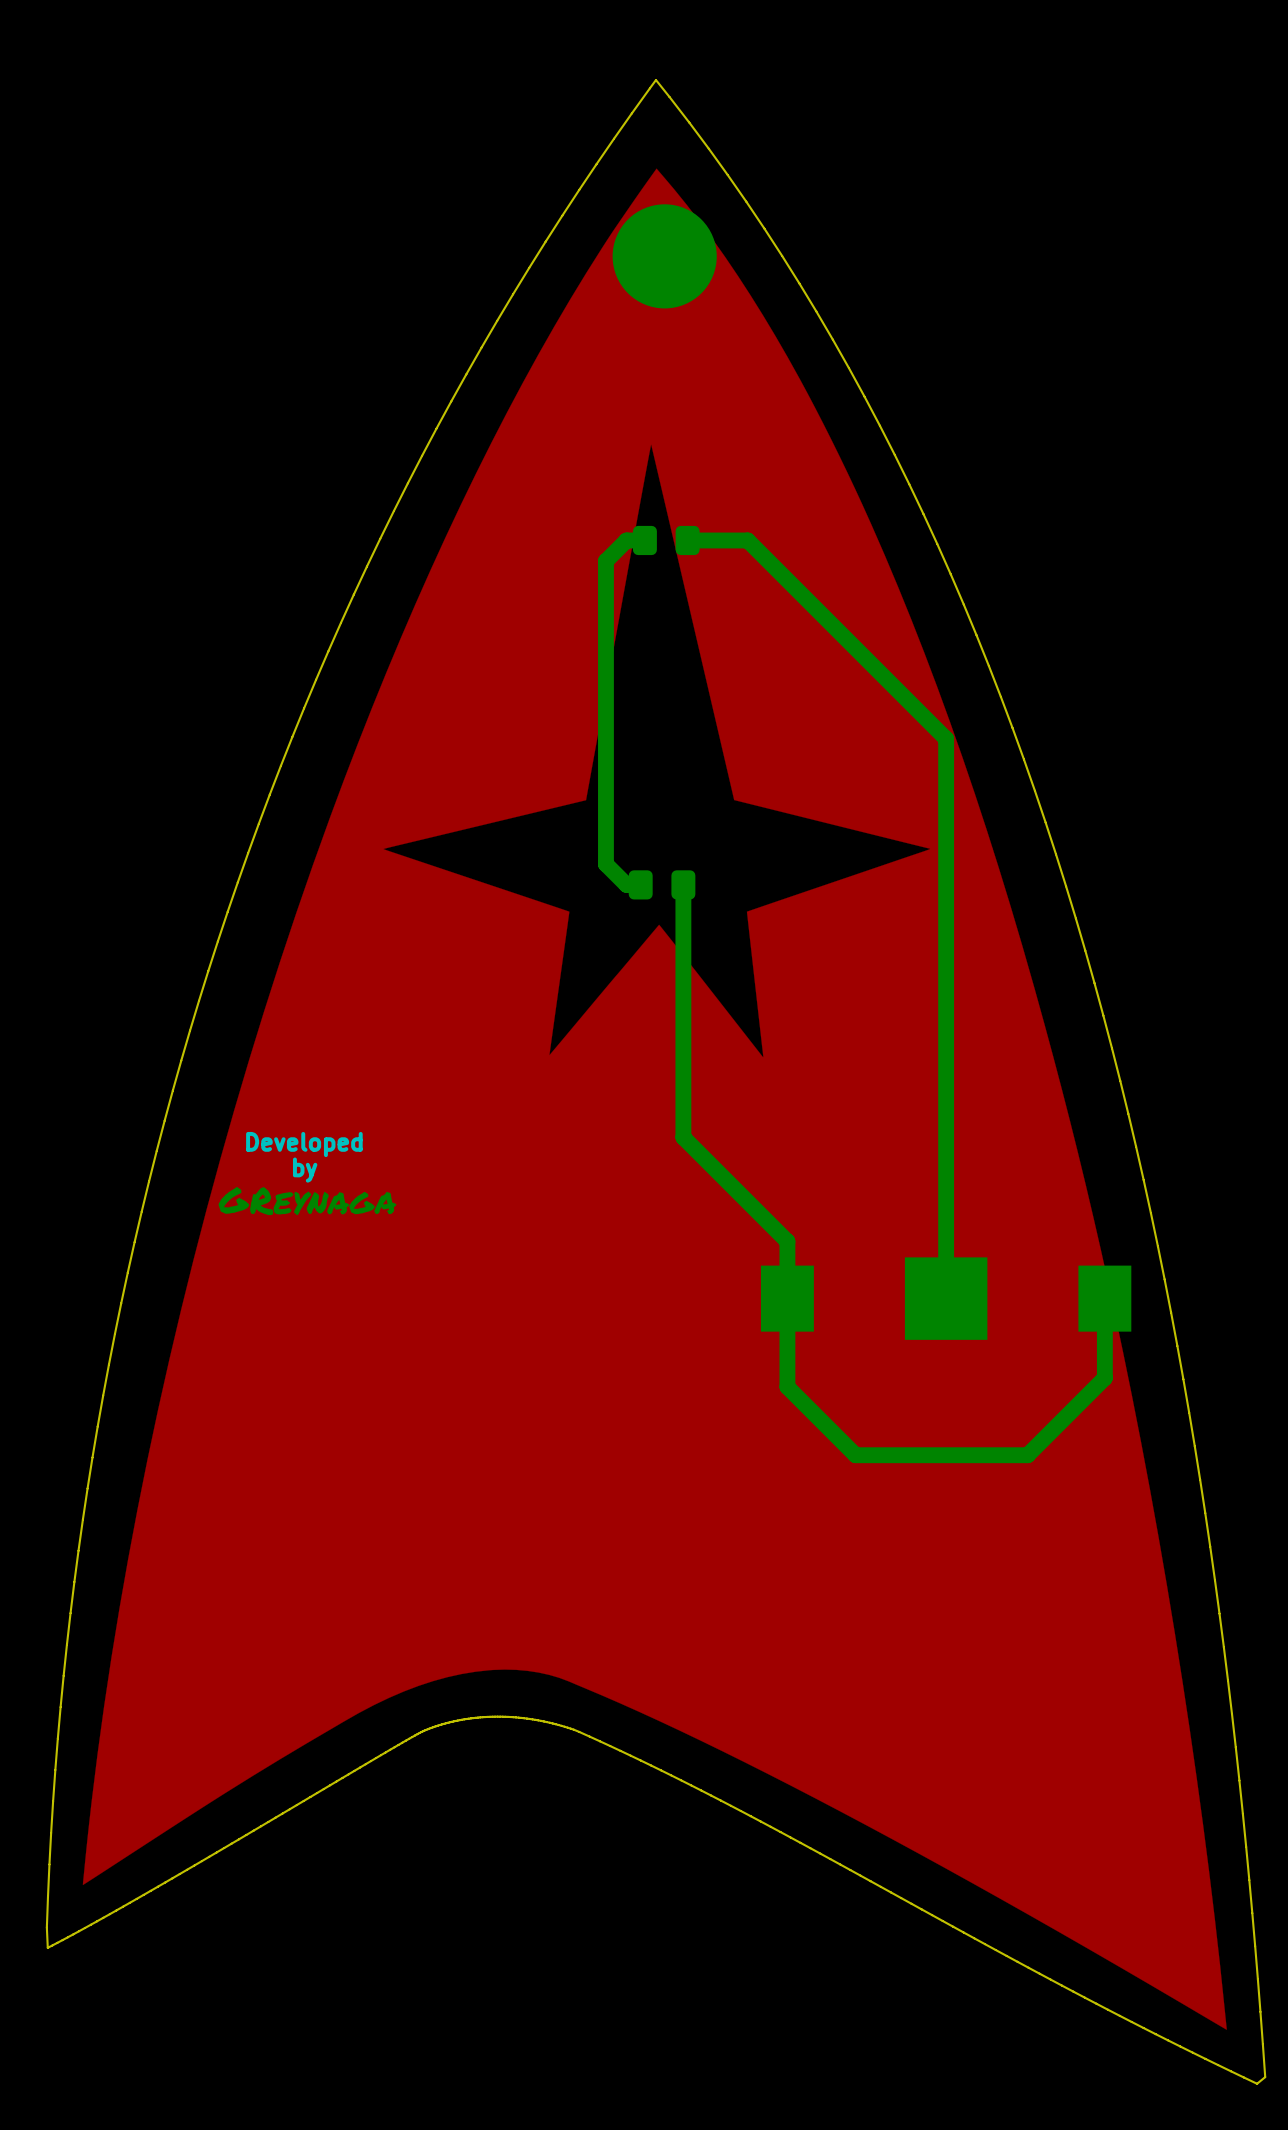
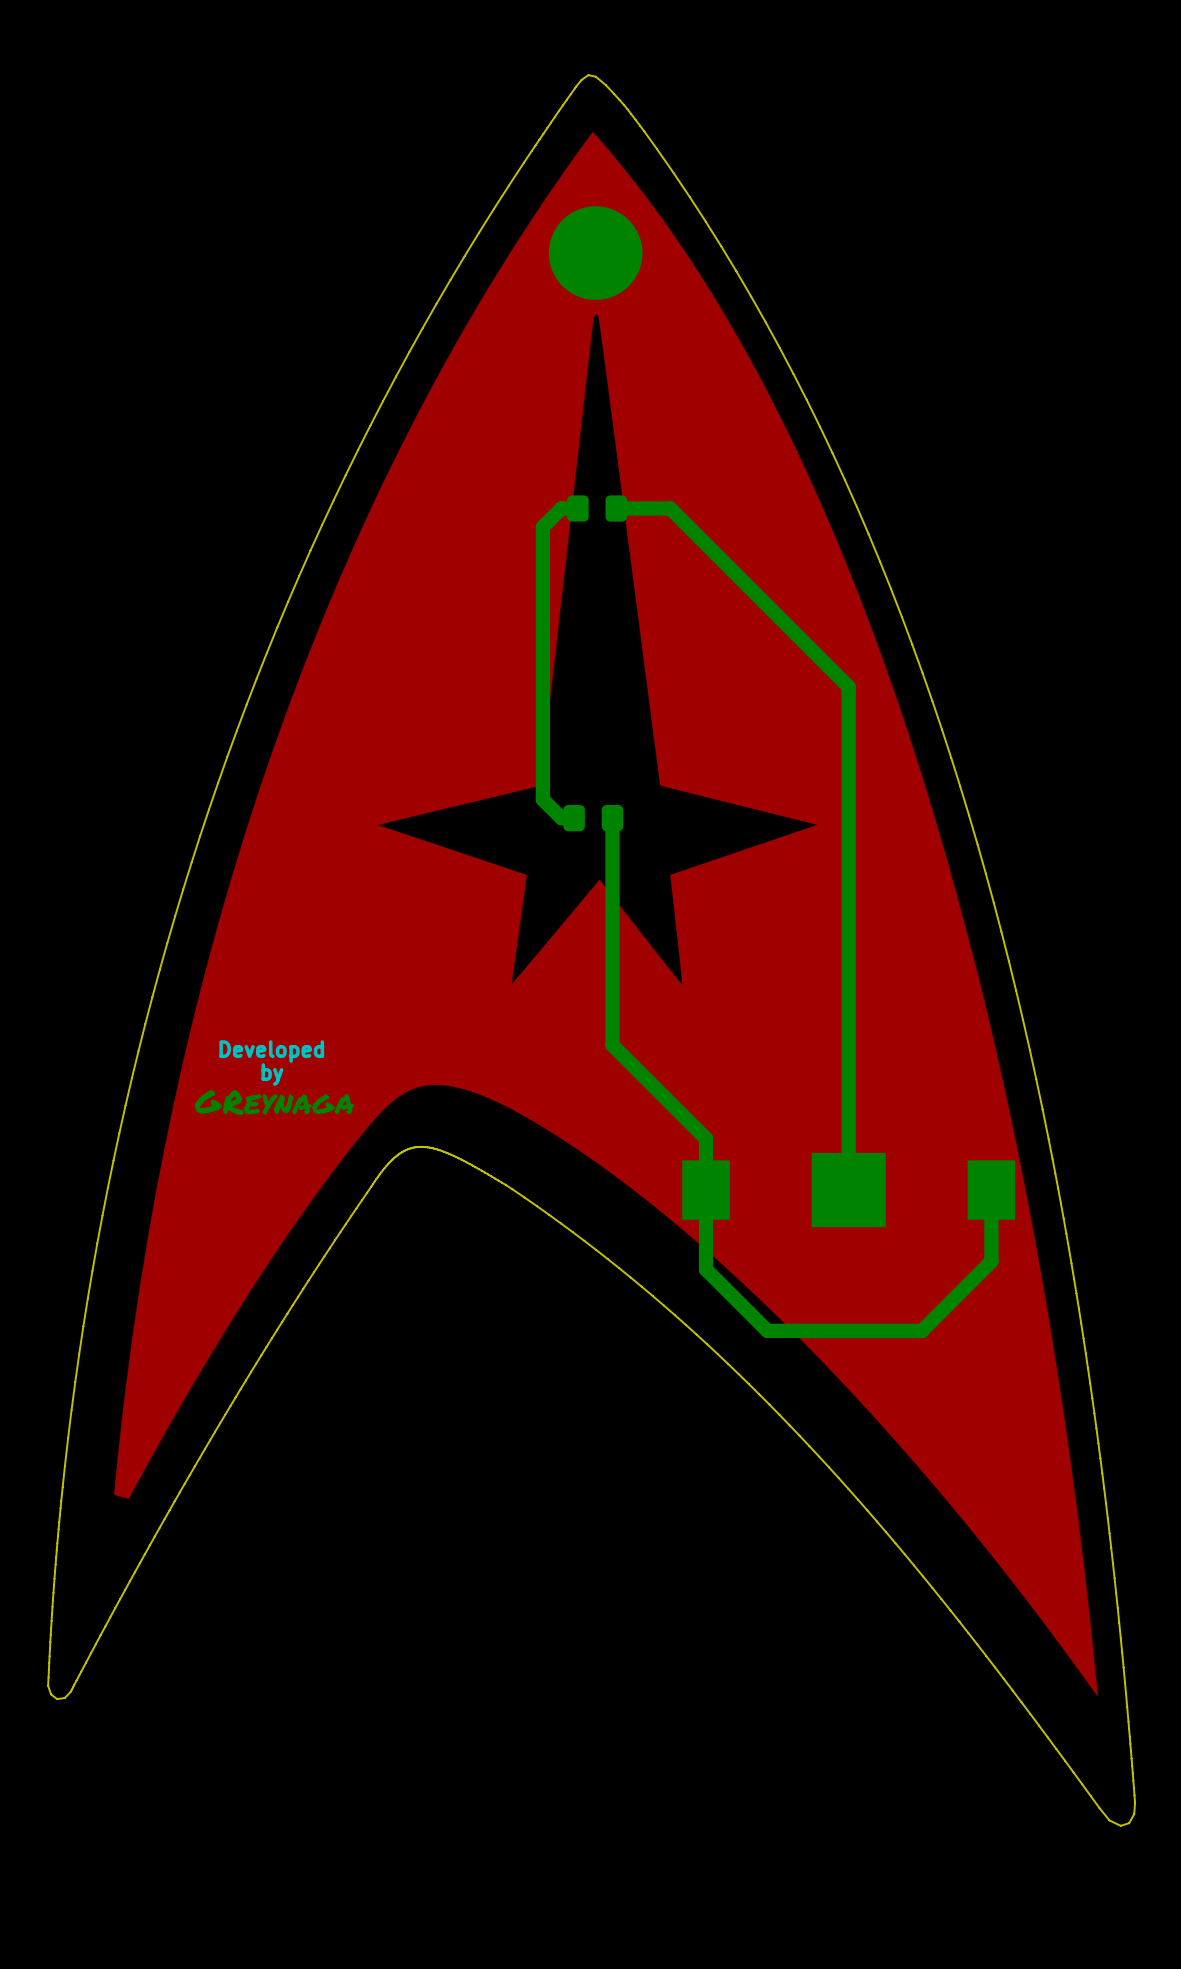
drawing: none -> [47, 74, 1136, 1827]
drawing: [45, 79, 1267, 2085] -> none

